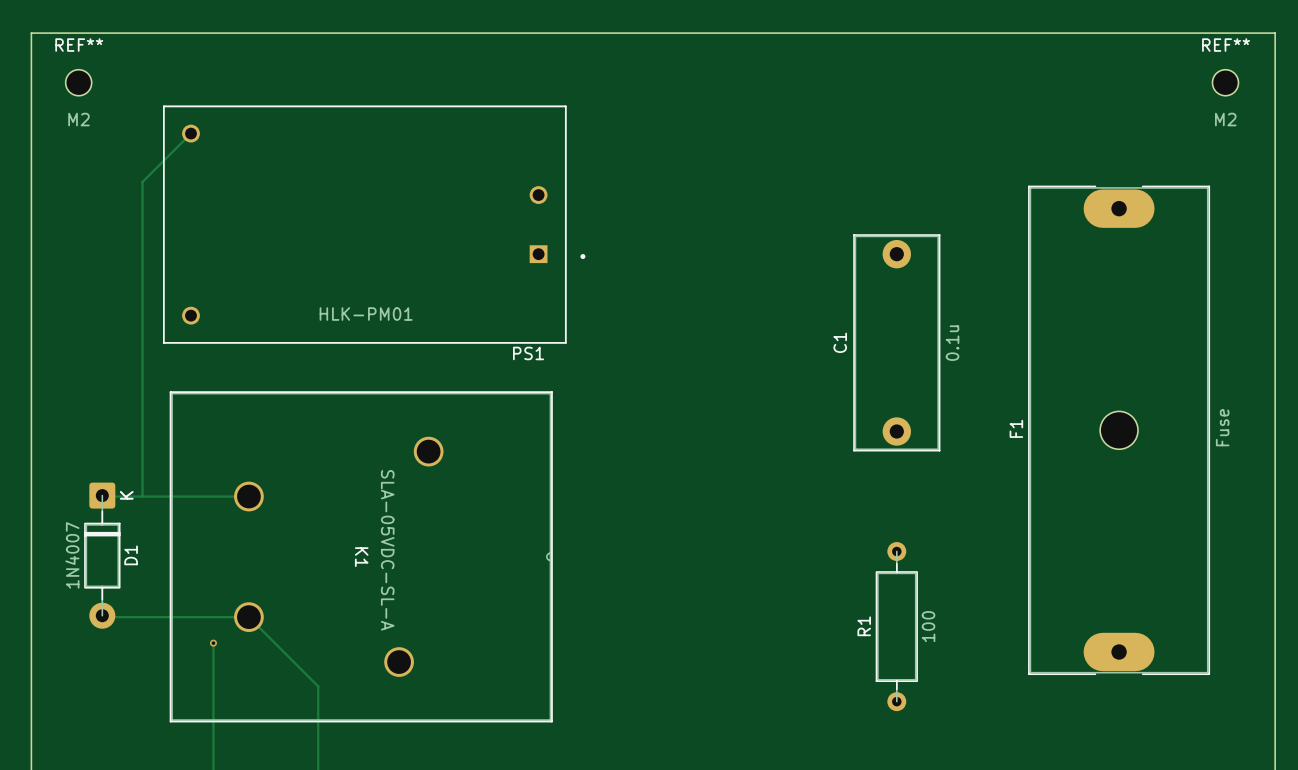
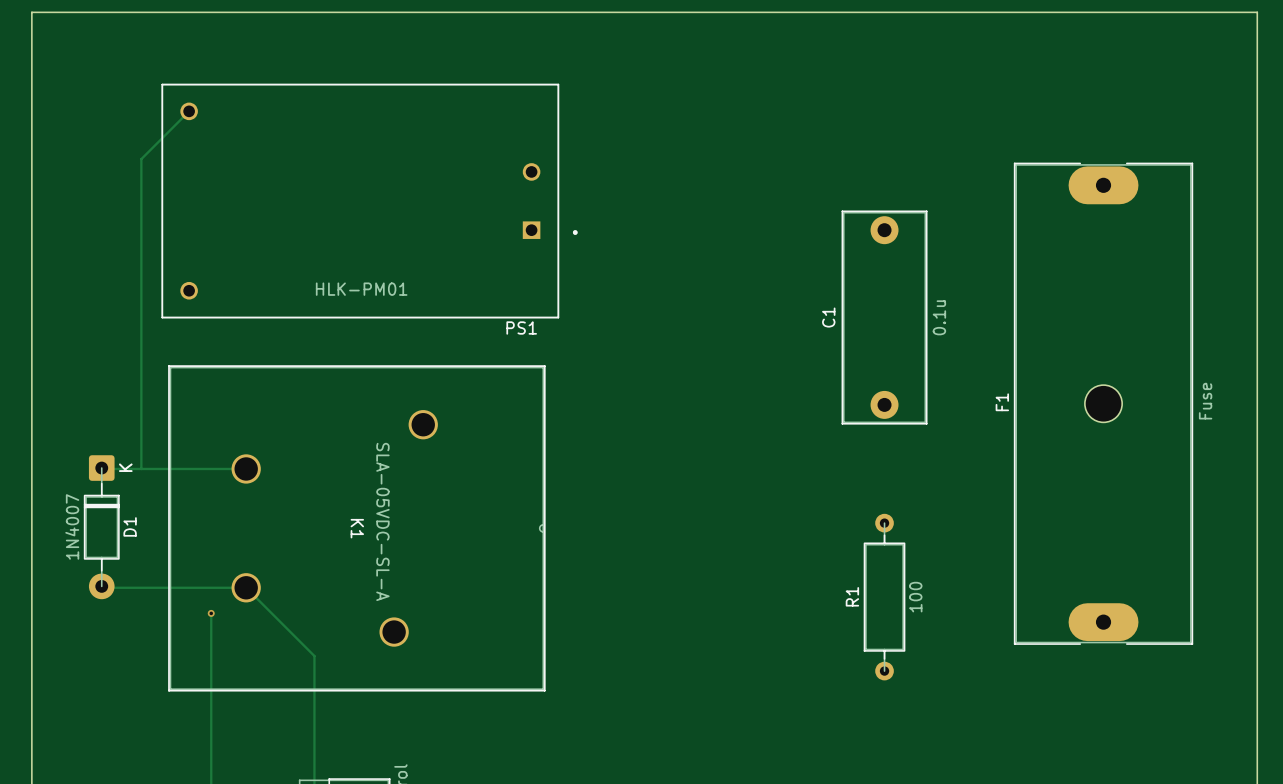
REF**: M2 (78, 82) -> none
REF**: M2 (1225, 82) -> none

